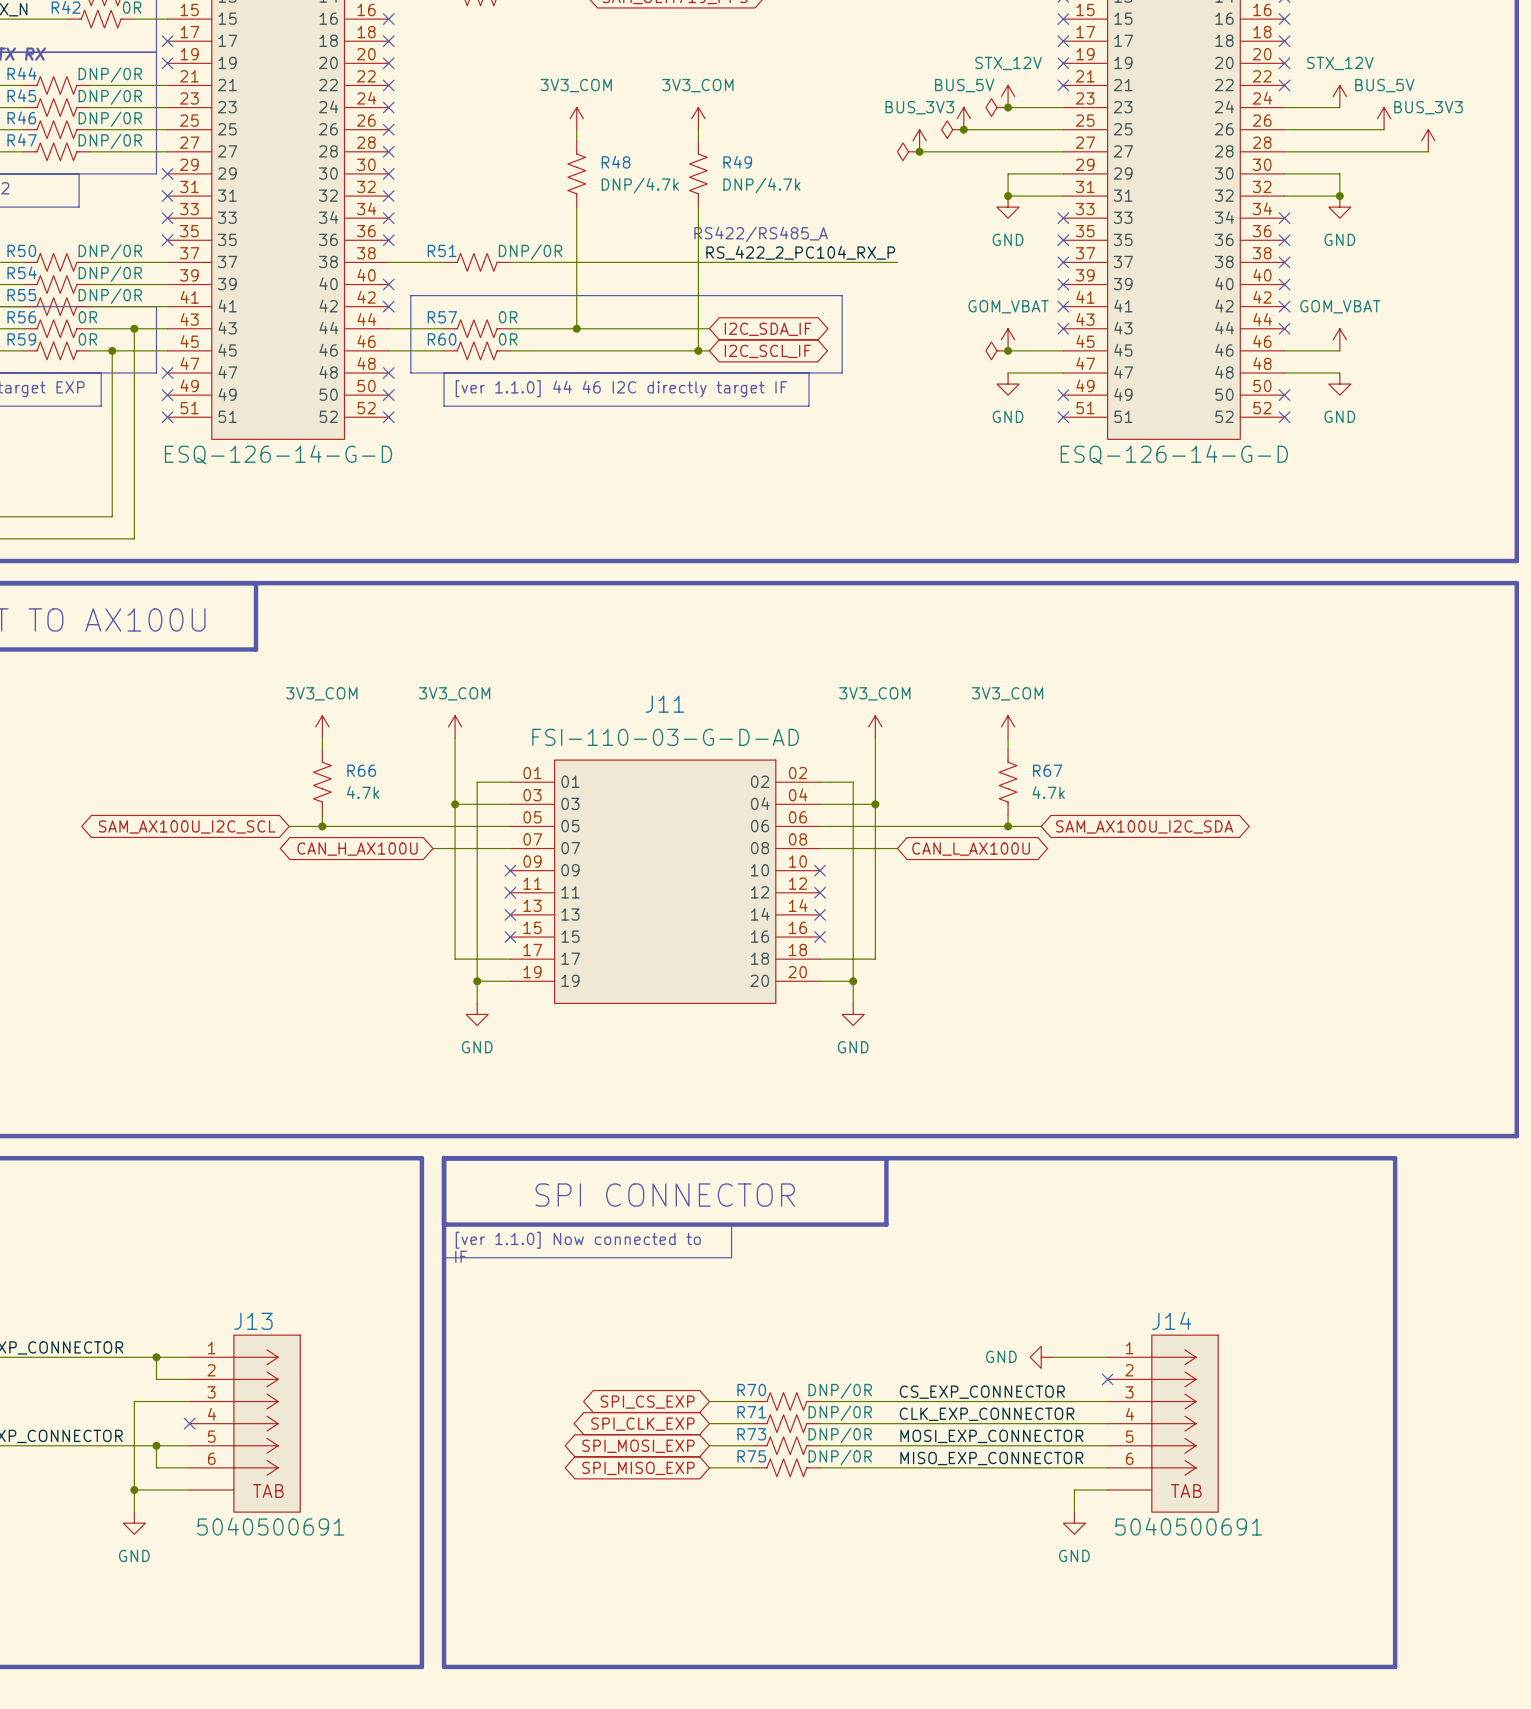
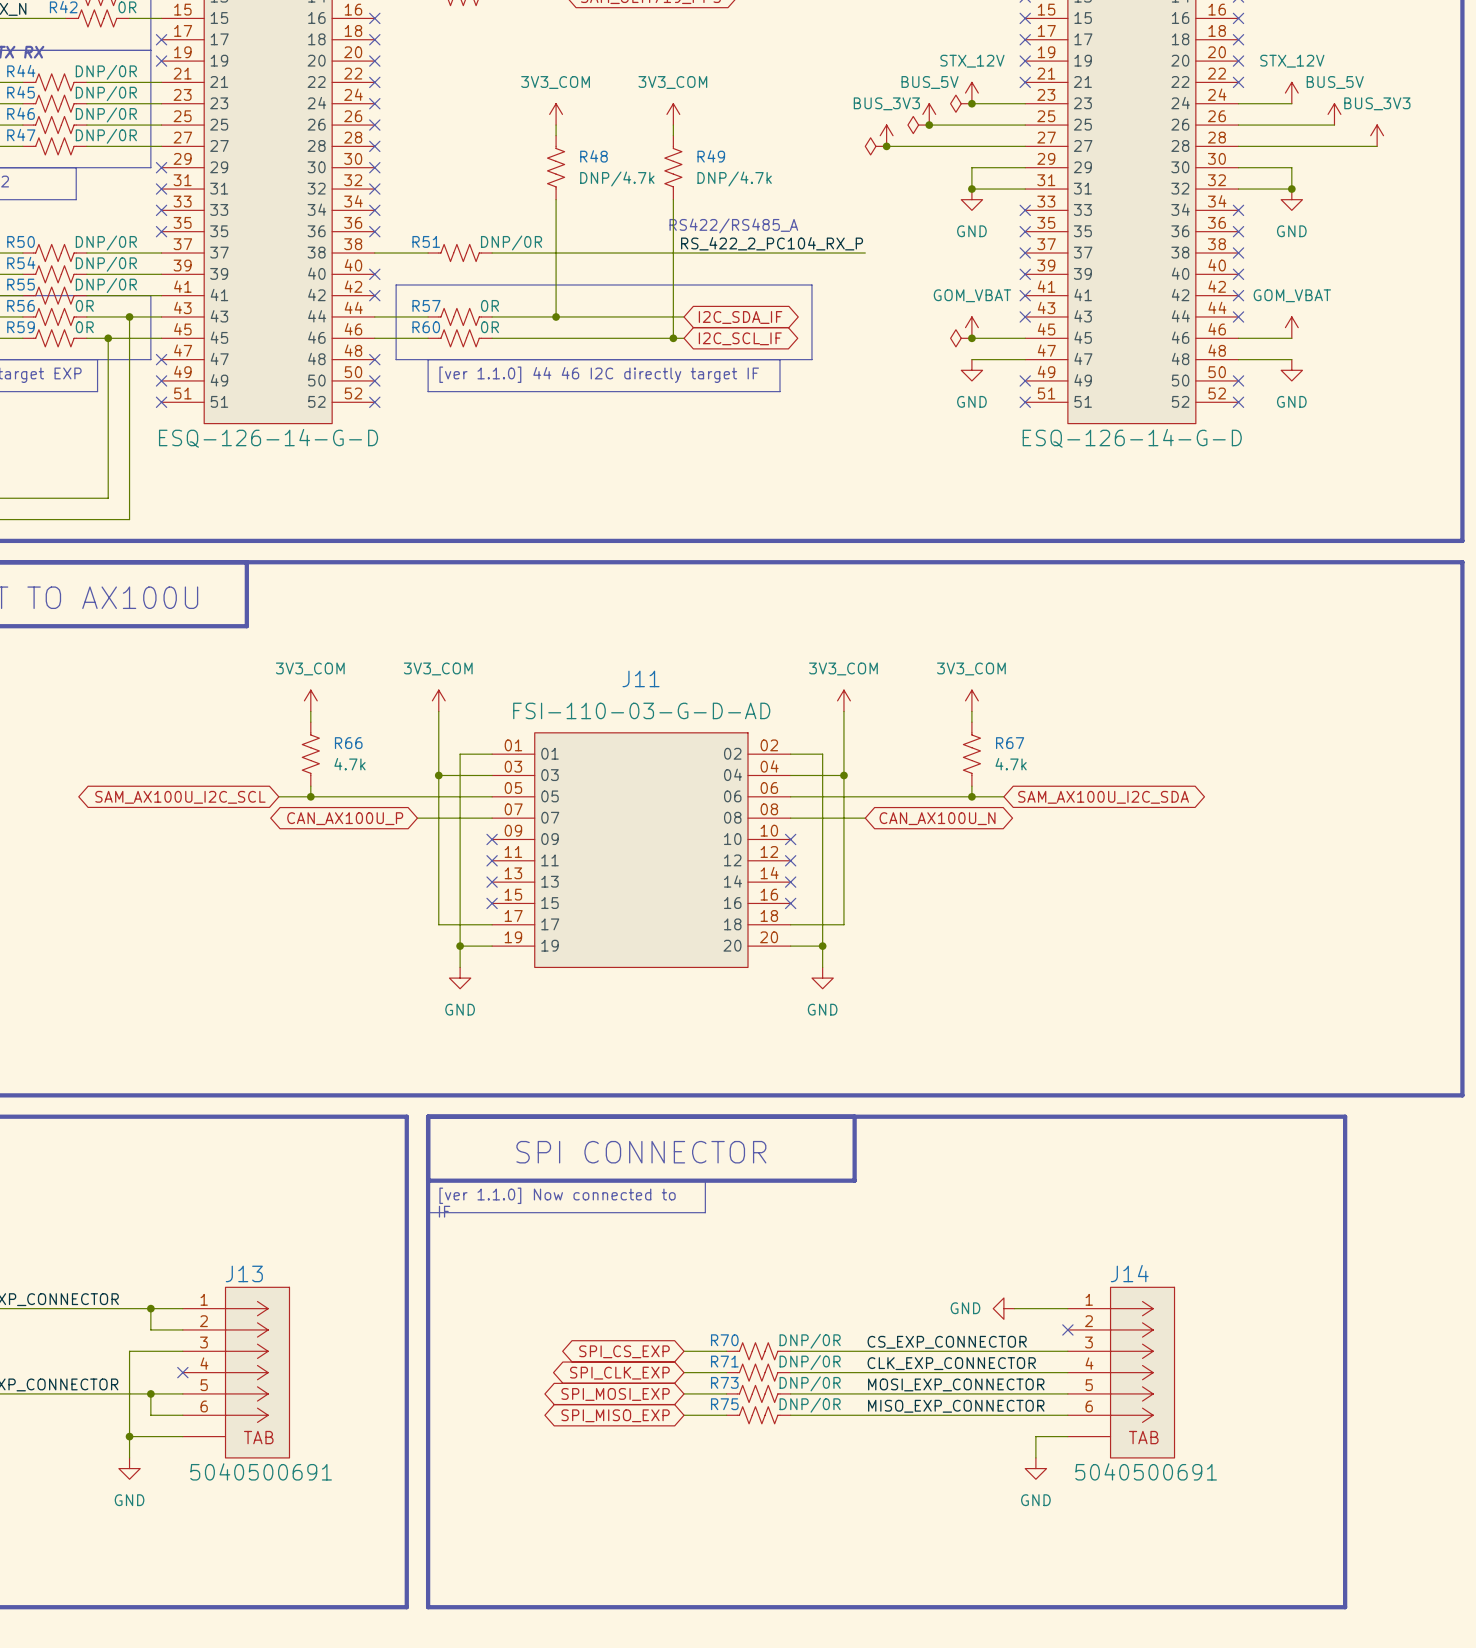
global label: CAN_H_AX100U (357, 849) -> CAN_AX100U_P (345, 818)
global label: CAN_L_AX100U (971, 849) -> CAN_AX100U_N (937, 818)

